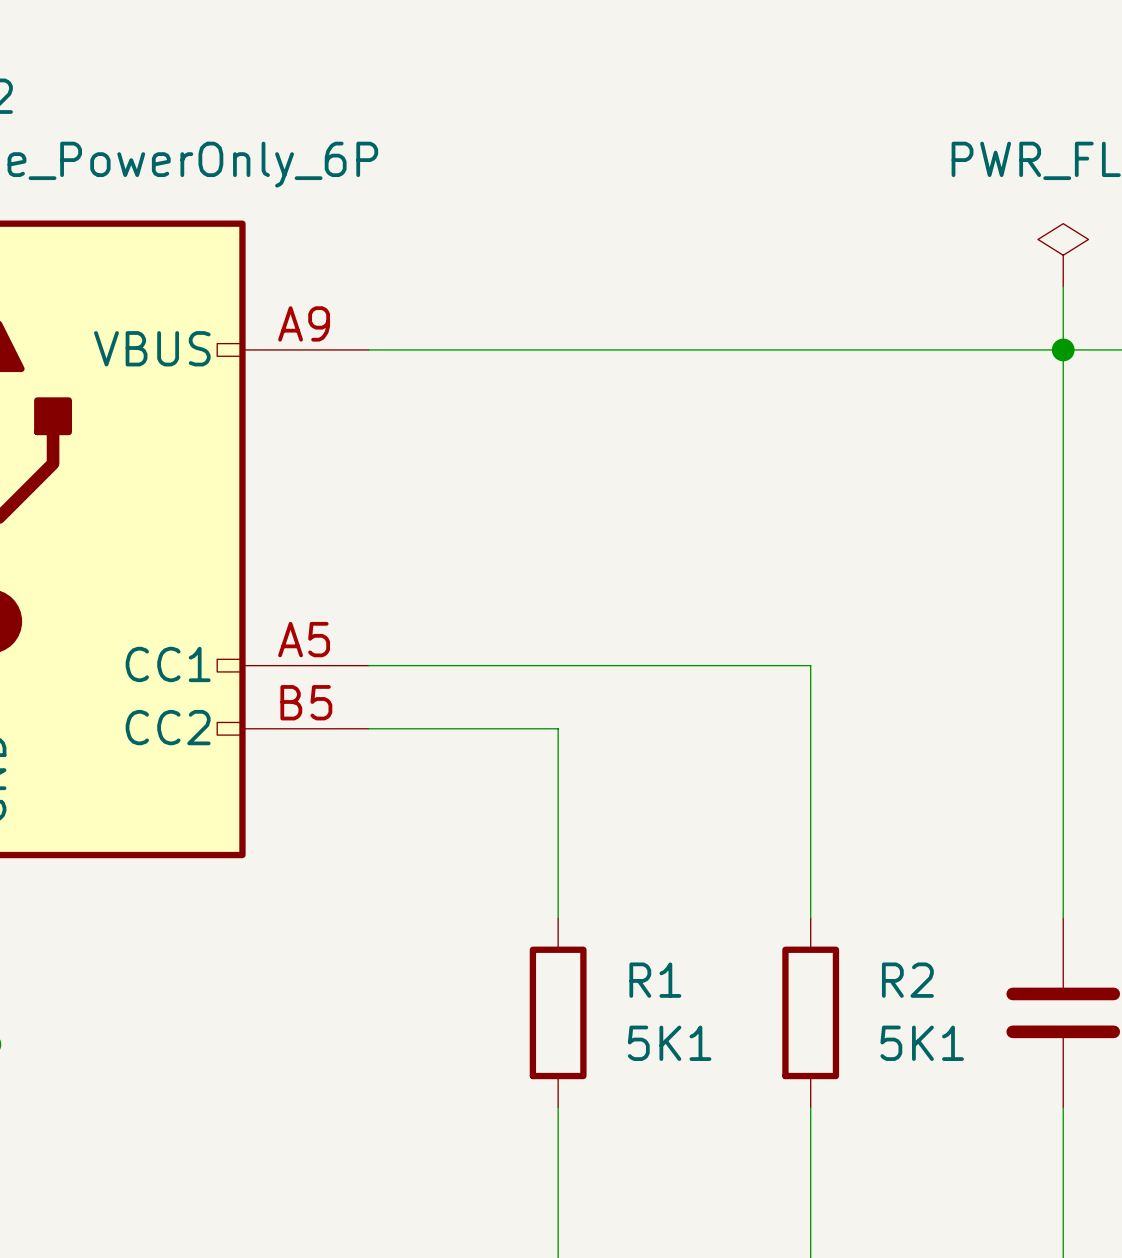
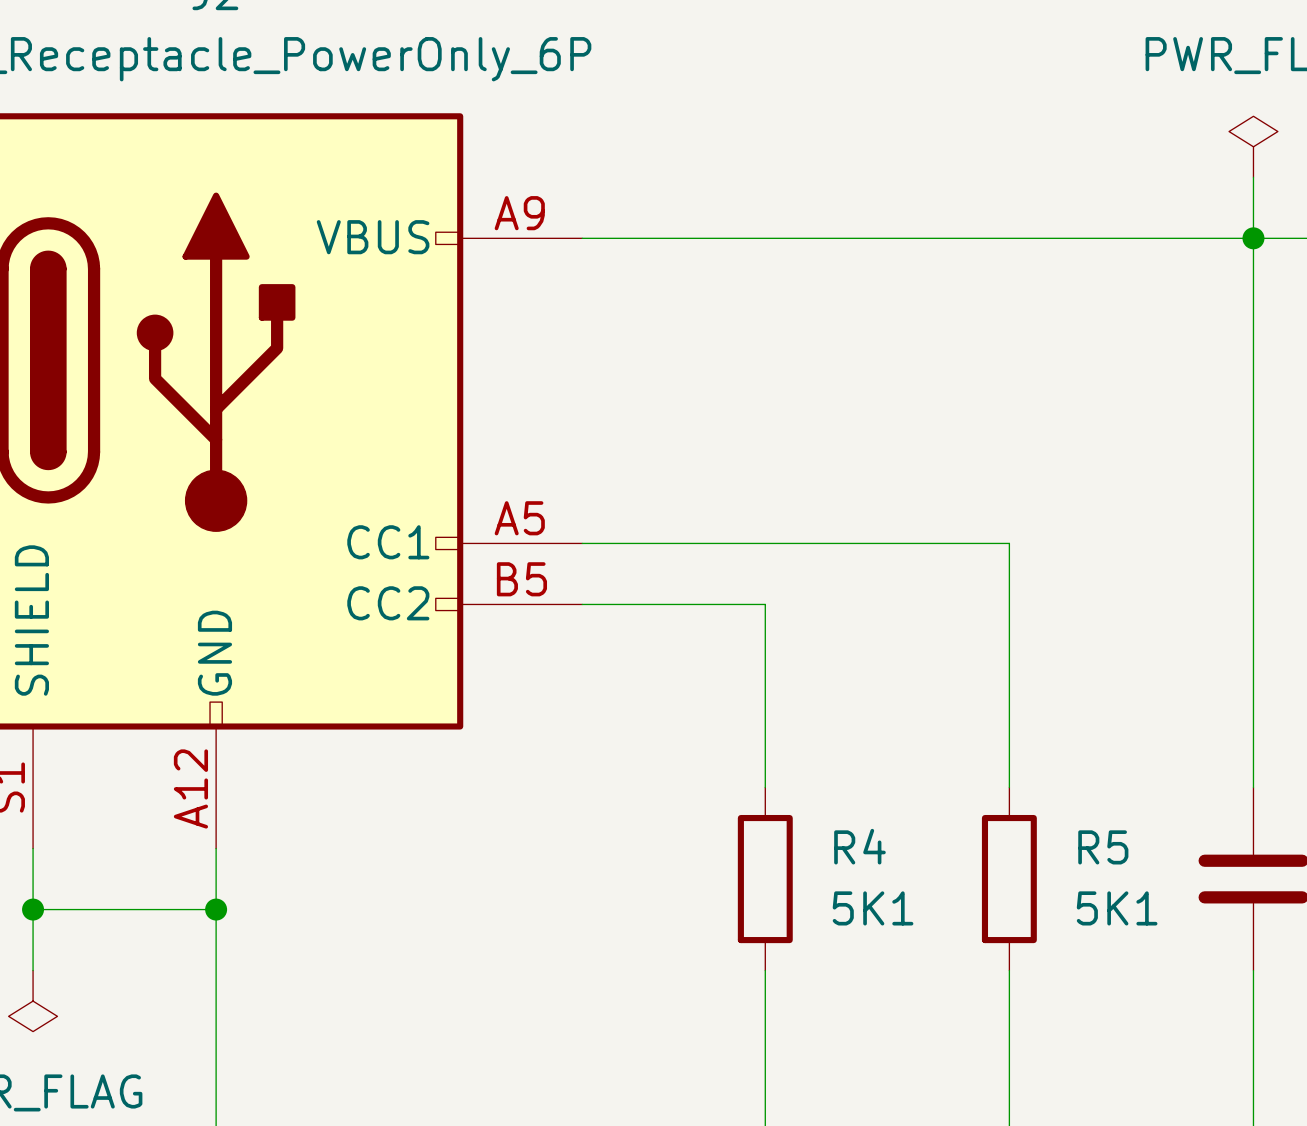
R1 name: R1 (655, 980) -> R4 (859, 846)
R2 name: R2 (907, 980) -> R5 (1103, 847)

